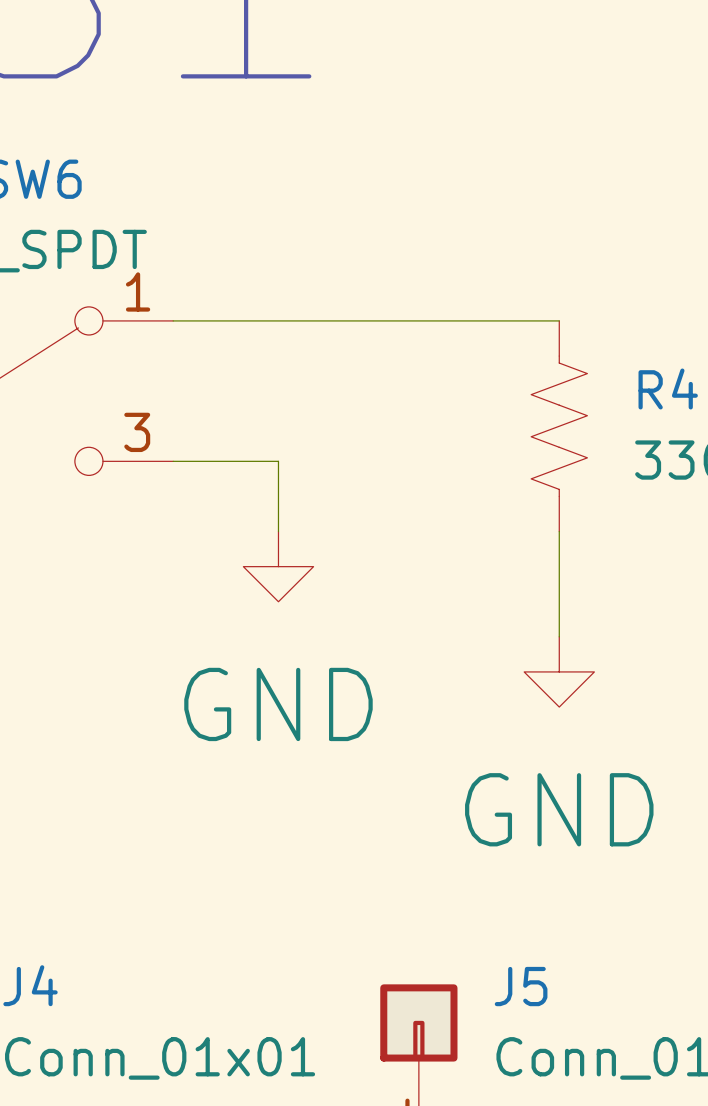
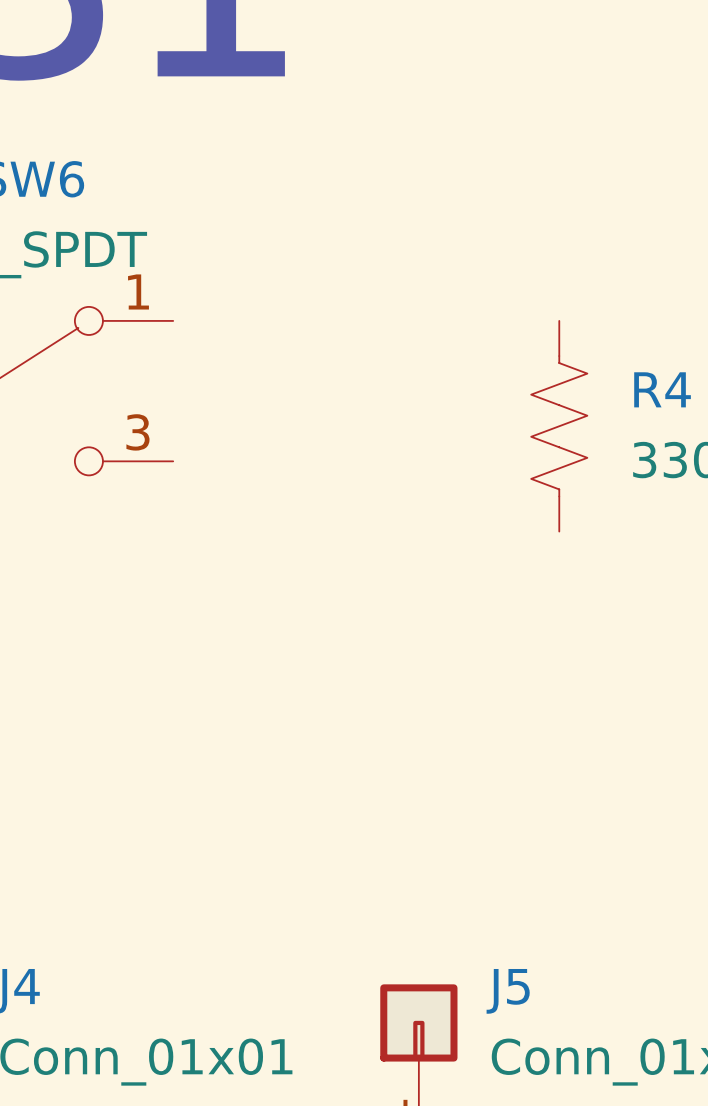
wire: (173, 320) (559, 320) -> none
wire: (173, 461) (278, 461) (278, 531) -> none
wire: (559, 531) (559, 636) -> none
power symbol: GND (278, 566) -> none
power symbol: GND (559, 671) -> none

